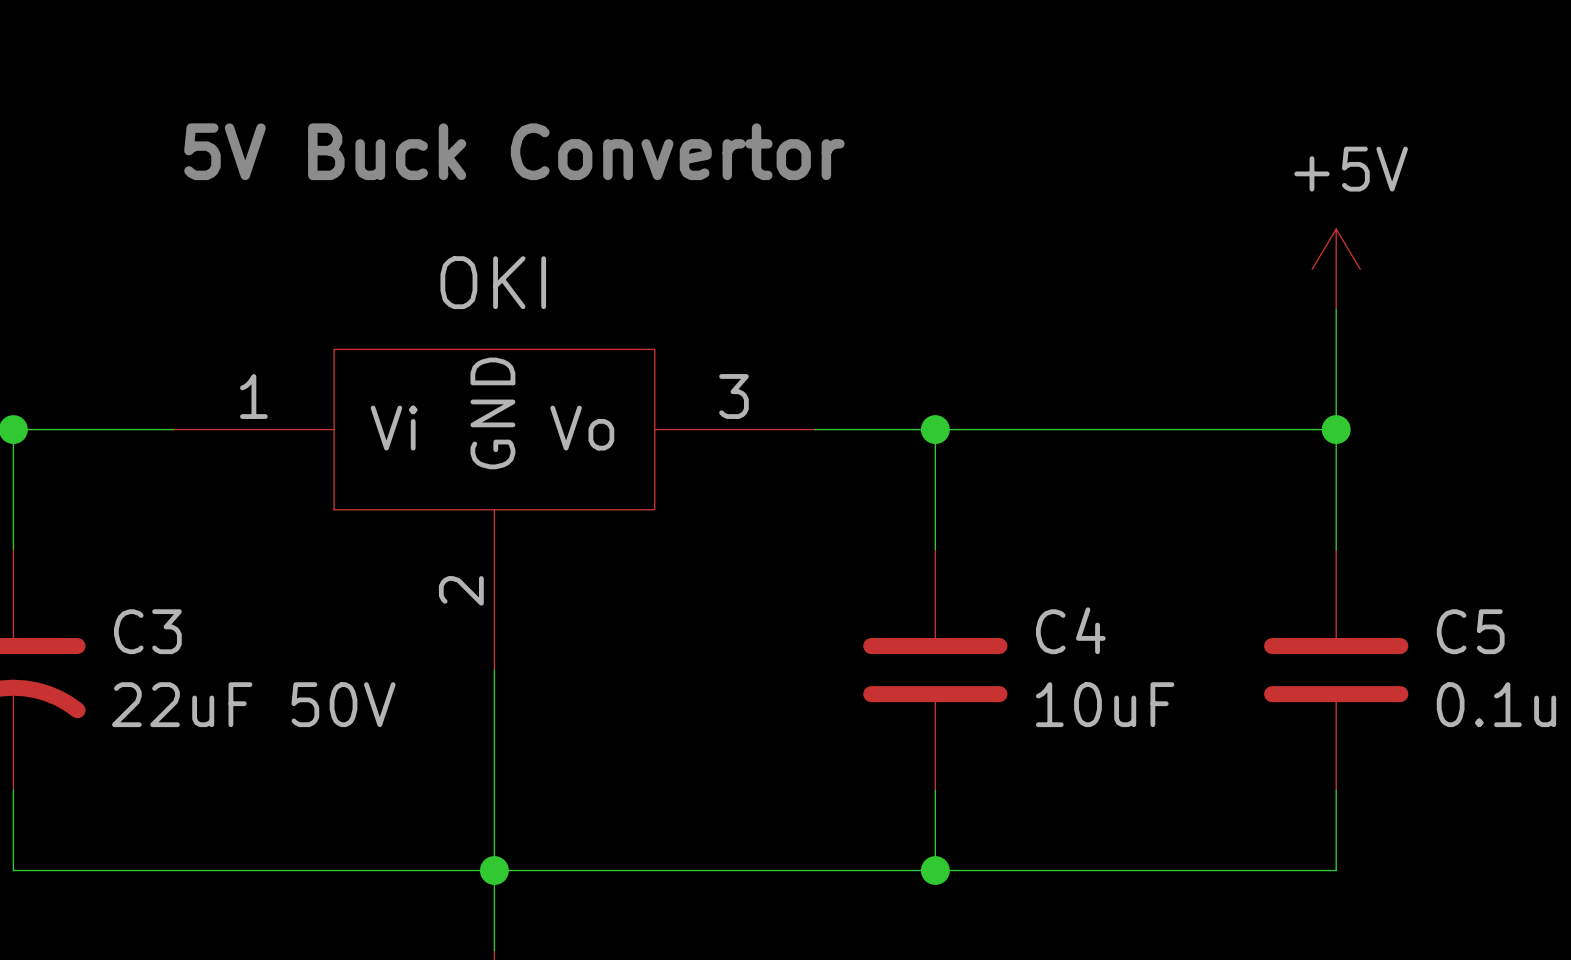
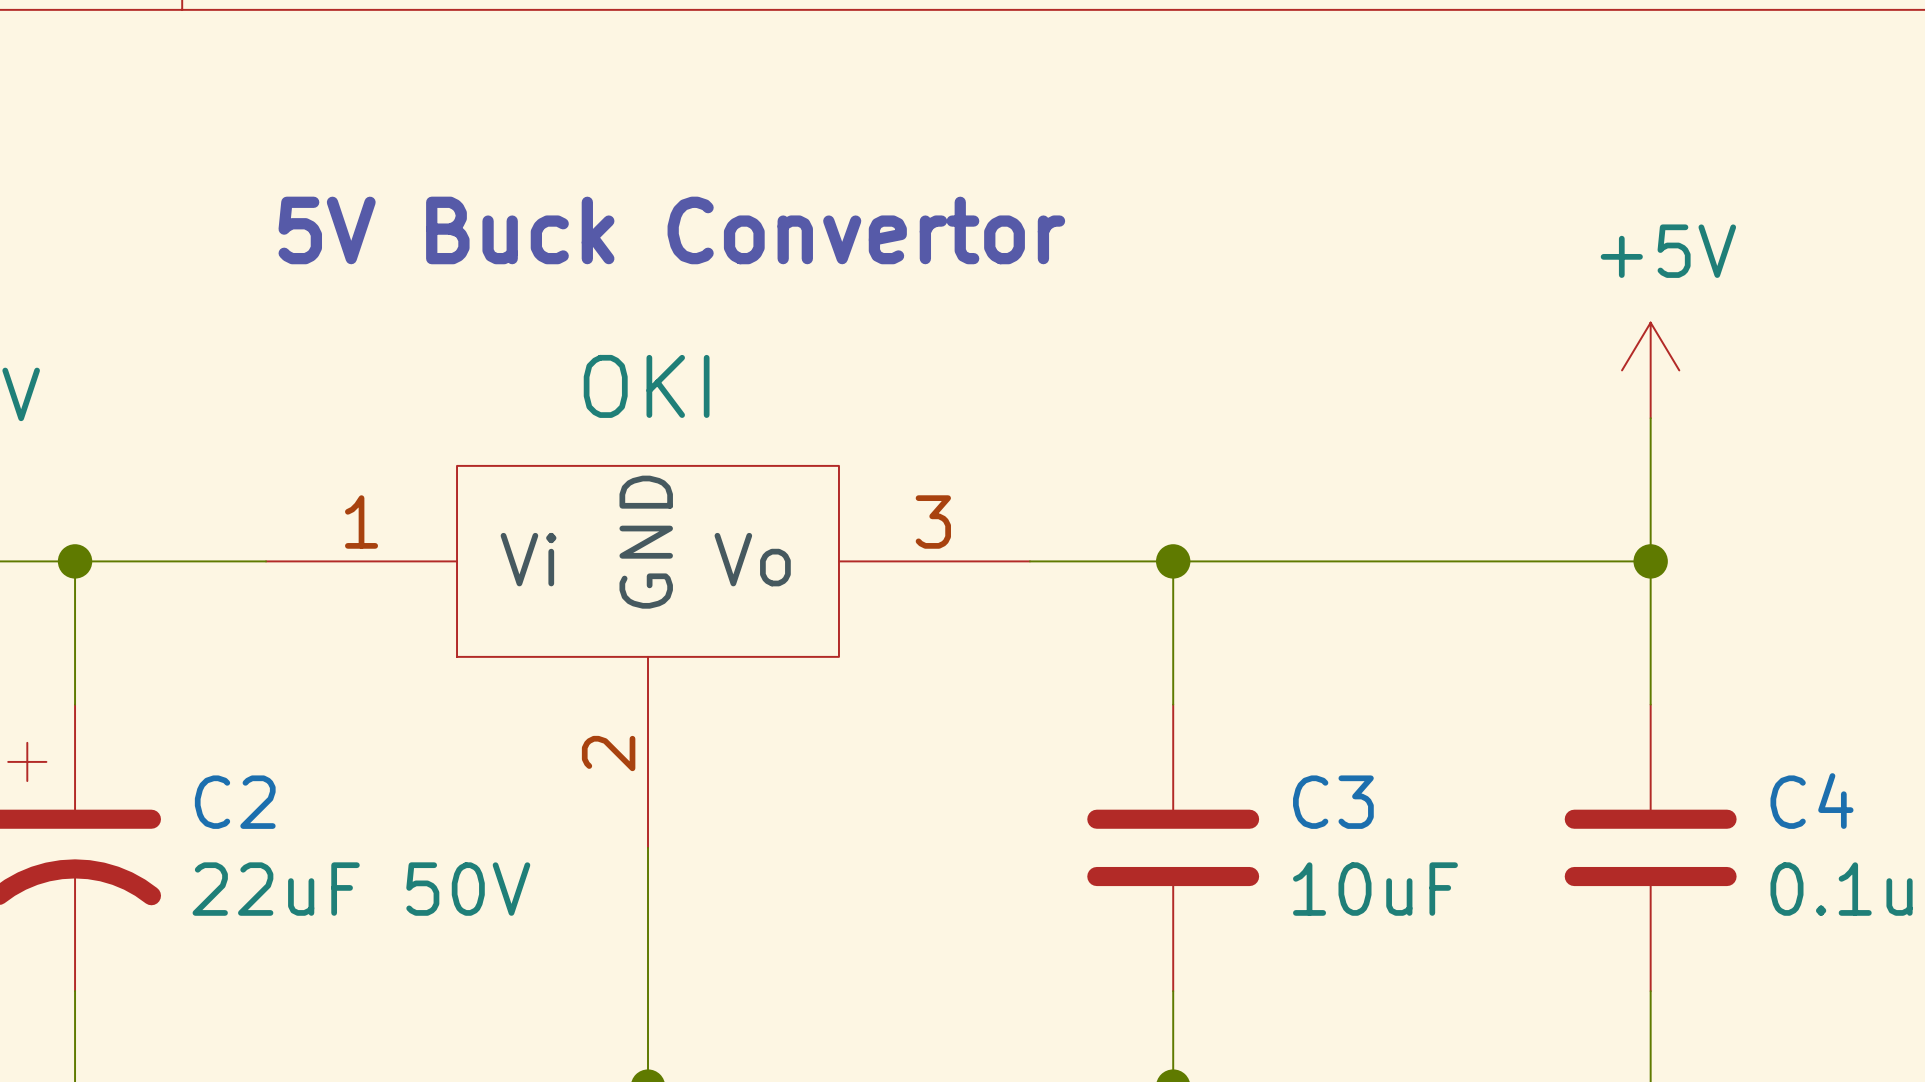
C4 name: C4 (1070, 630) -> C3 (1333, 802)
C3 name: C3 (147, 631) -> C2 (235, 802)
C5 name: C5 (1470, 631) -> C4 (1811, 801)

